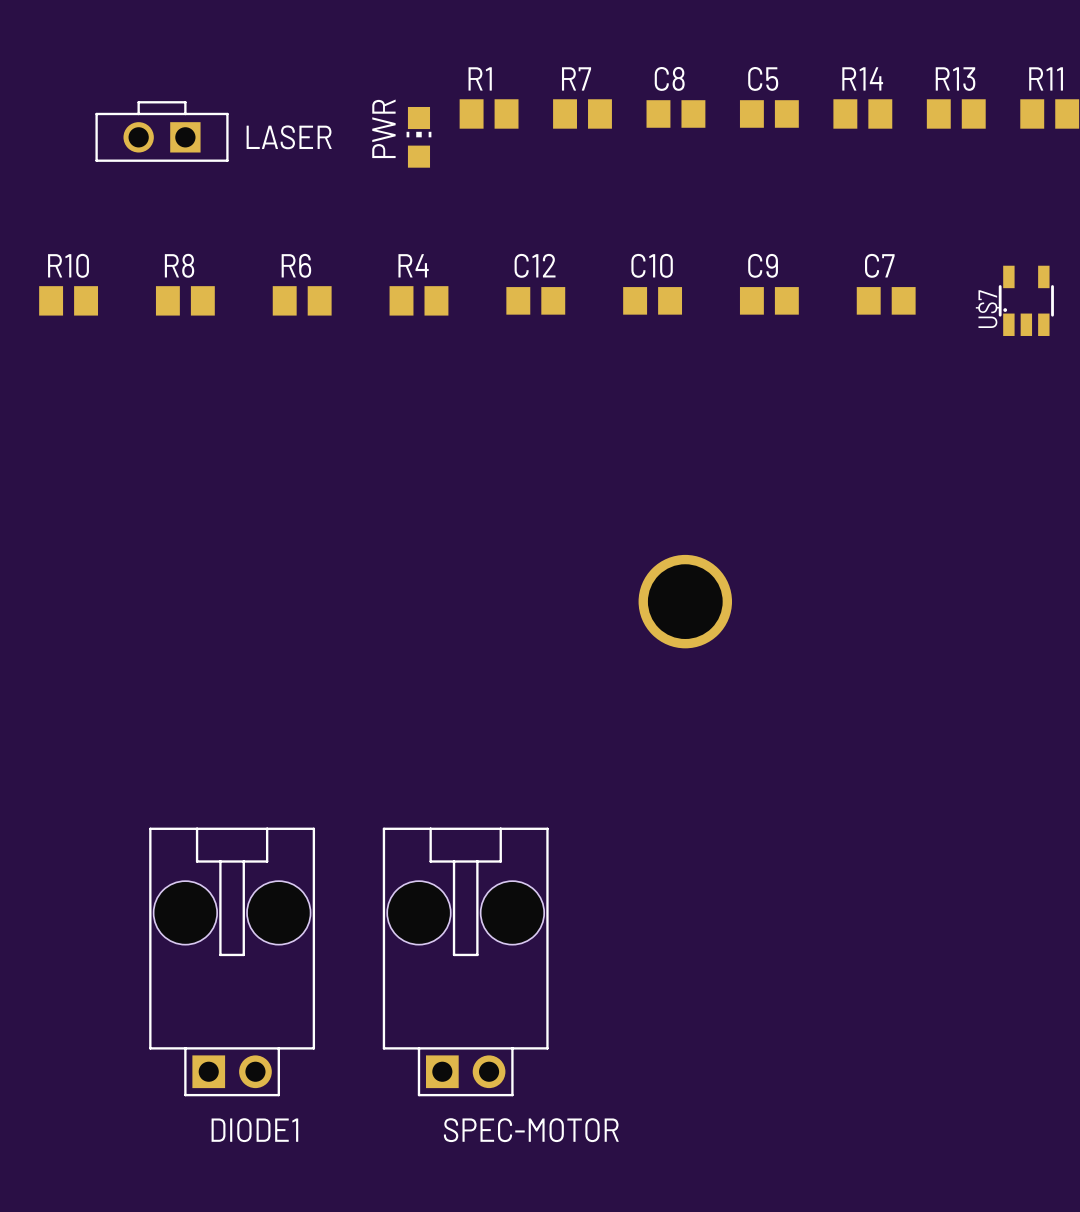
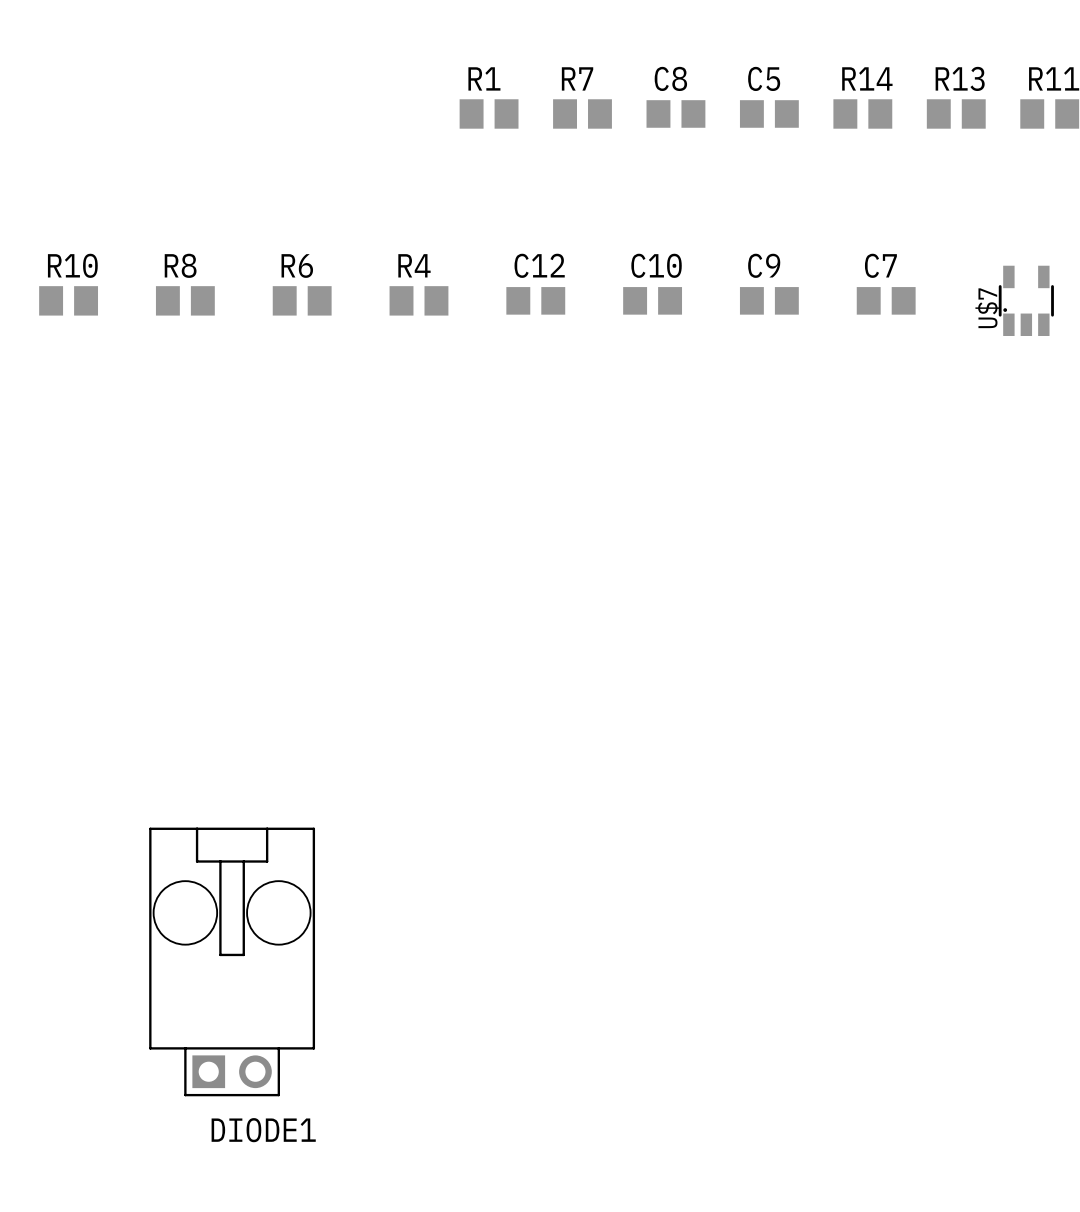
LASER: (162, 131) -> none
PWR: (418, 137) -> none
part: (685, 601) -> none
SPEC-MOTOR: (465, 961) -> none

